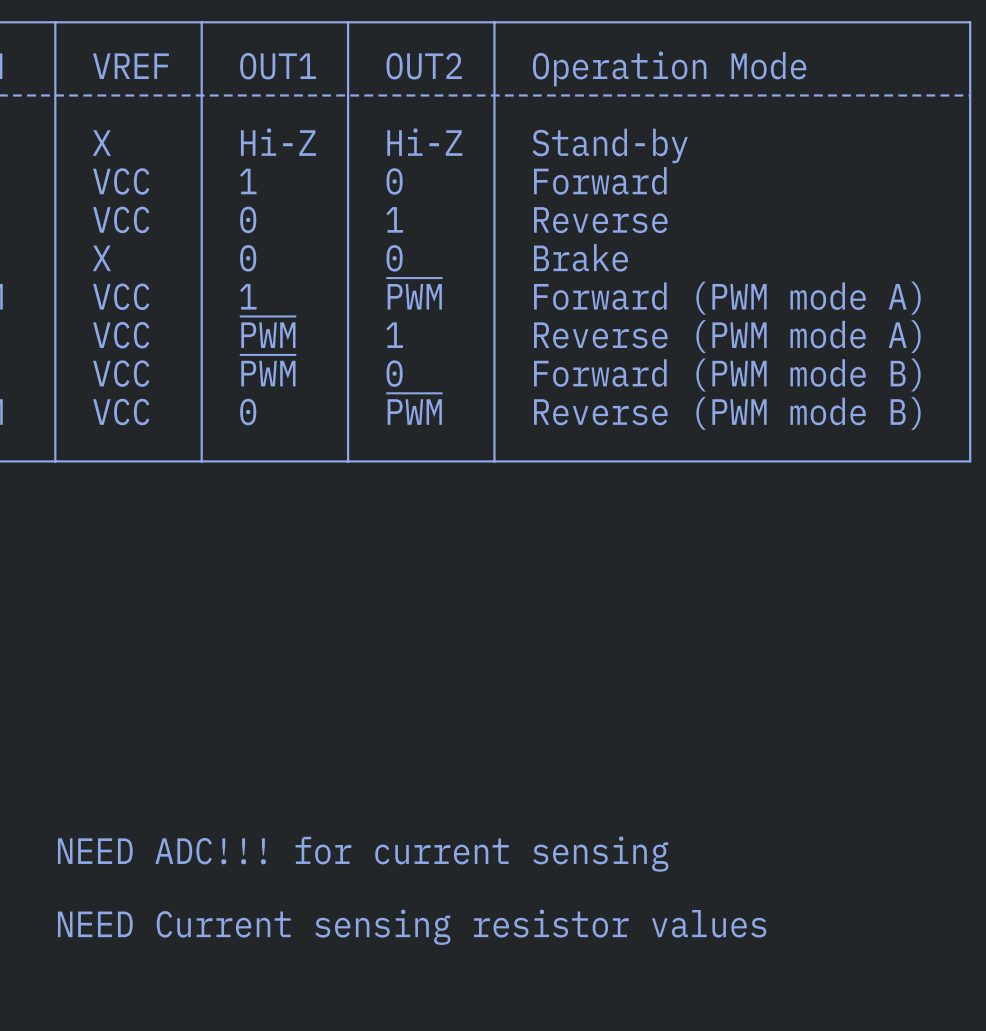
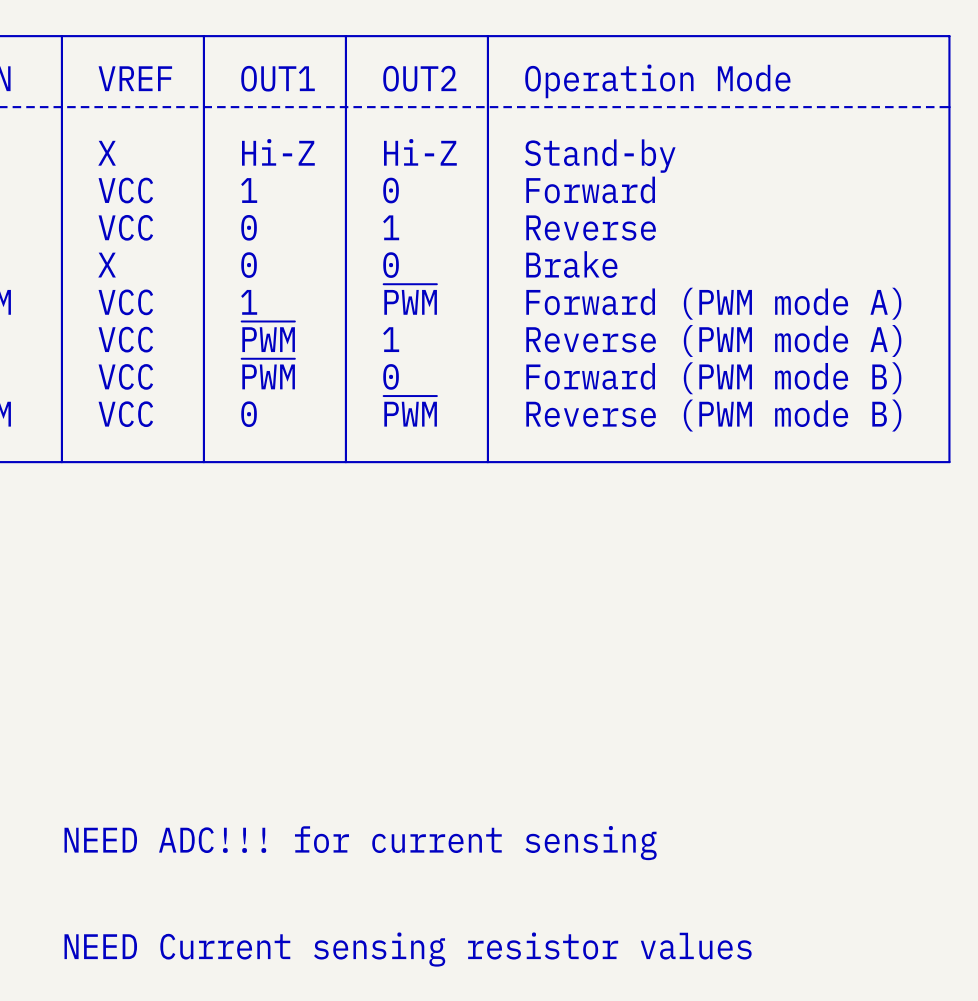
text position: NEED Current sensing resistor values (412, 927) -> NEED Current sensing resistor values (408, 949)

